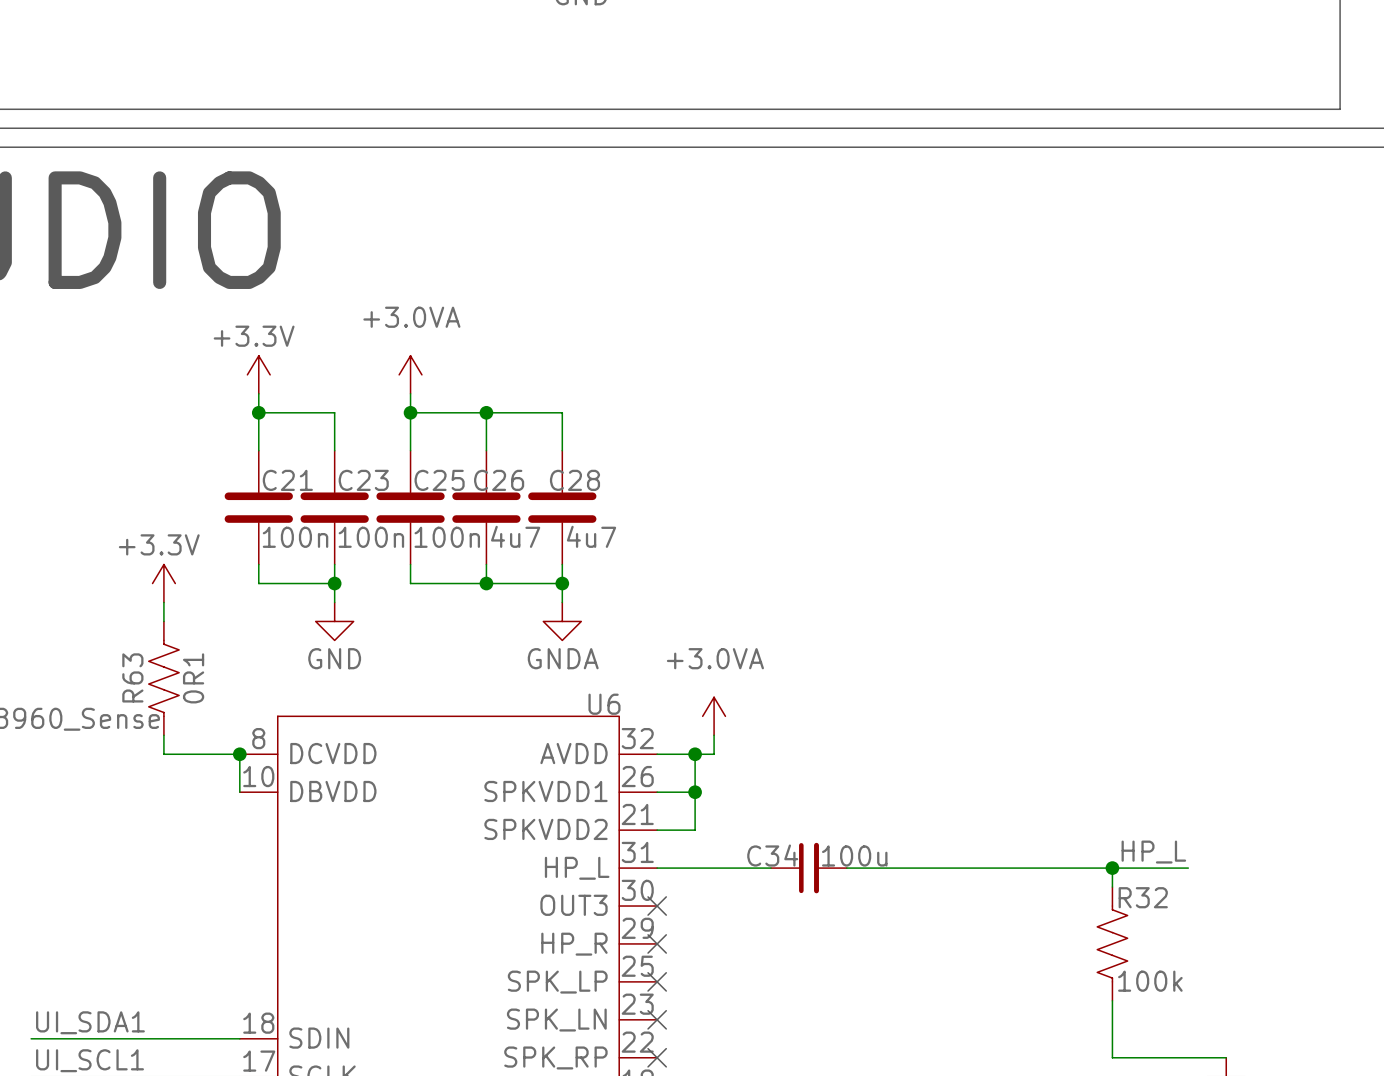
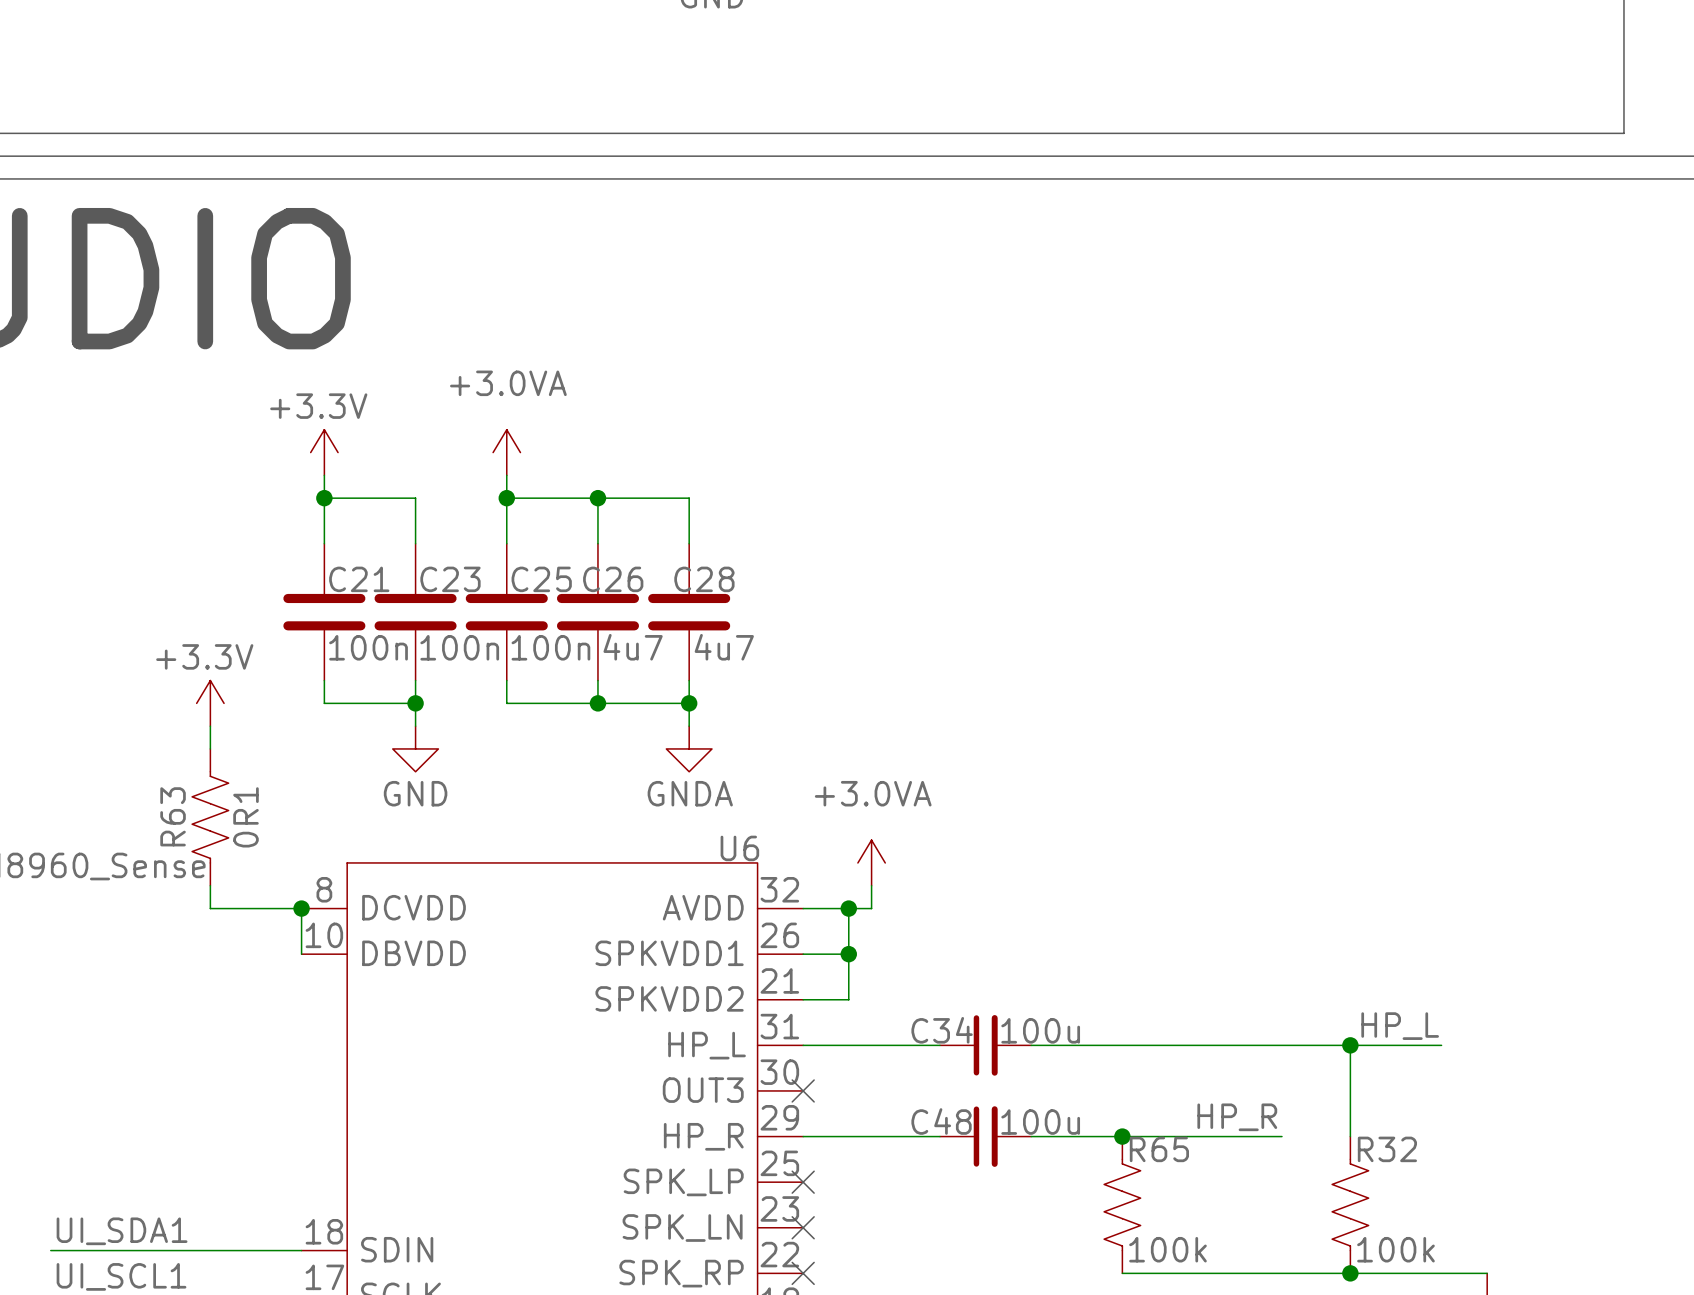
wire: none -> (1350, 1068) (1350, 1136)
label: none -> HP_R (1237, 1117)
wire: none -> (803, 1136) (939, 1136)
no-connect mark: (657, 943) -> none
C48: none -> 100u (985, 1136)
wire: none -> (1031, 1136) (1281, 1136)
junction: none -> (1122, 1136)
R32 position: (1112, 943) -> (1350, 1204)
R65: none -> 100k (1122, 1204)
wire: (1112, 1000) (1112, 1057) -> (1122, 1273) (1350, 1273)
junction: none -> (1350, 1273)

